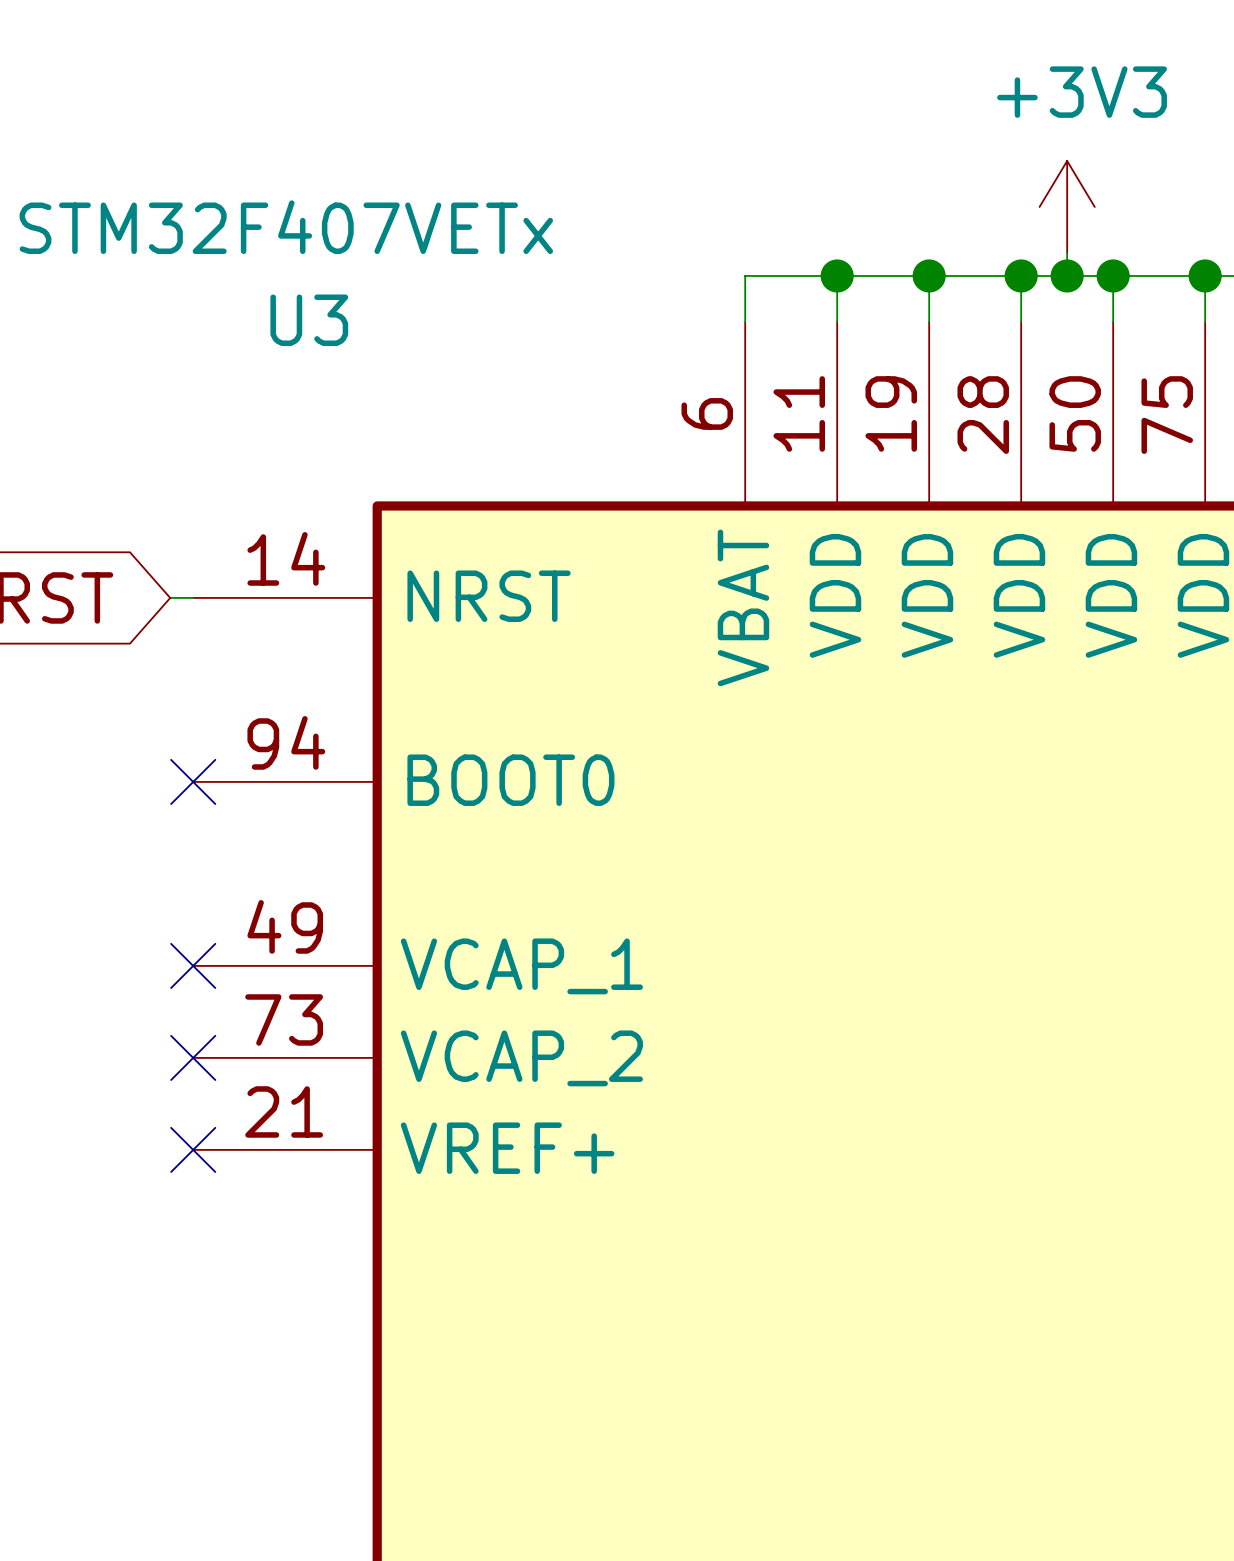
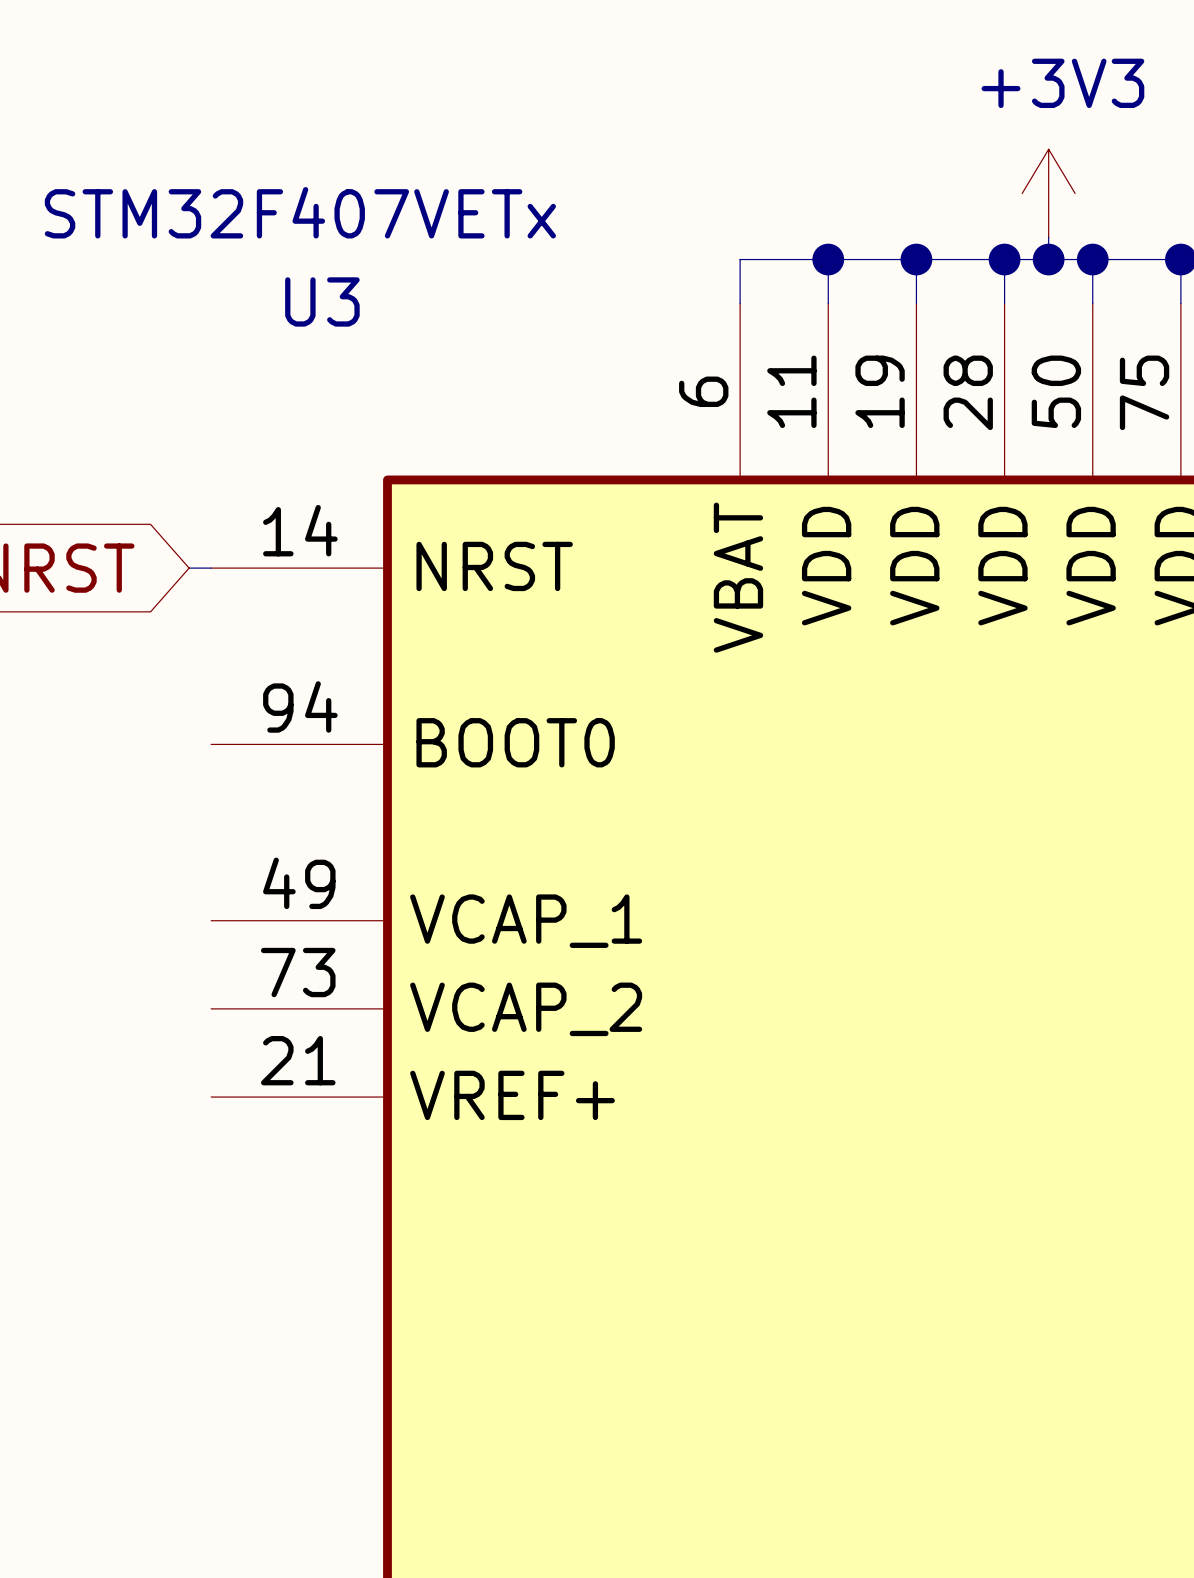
no-connect mark: (193, 781) -> none
no-connect mark: (193, 965) -> none
no-connect mark: (193, 1057) -> none
no-connect mark: (193, 1149) -> none

